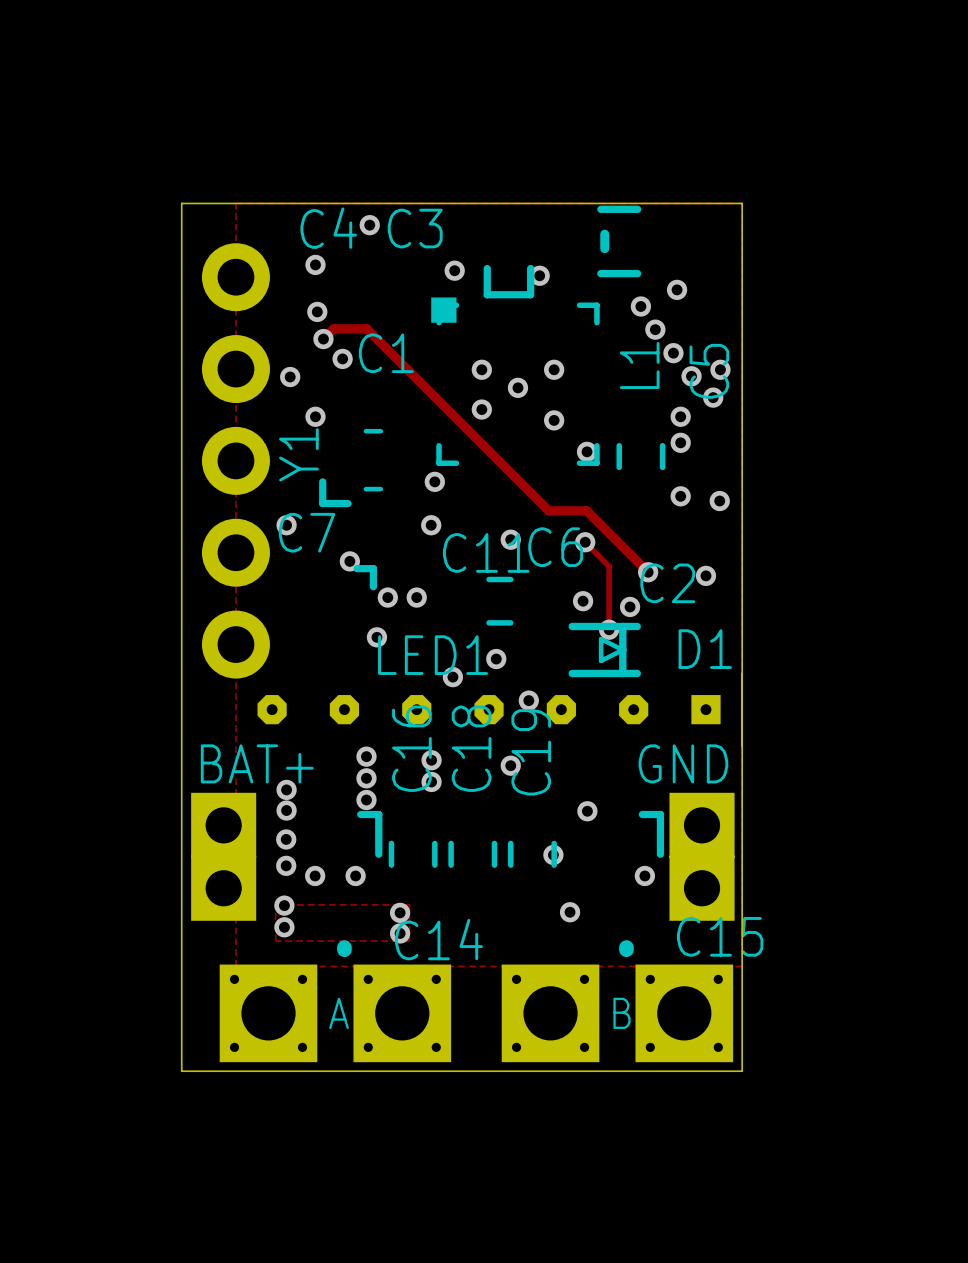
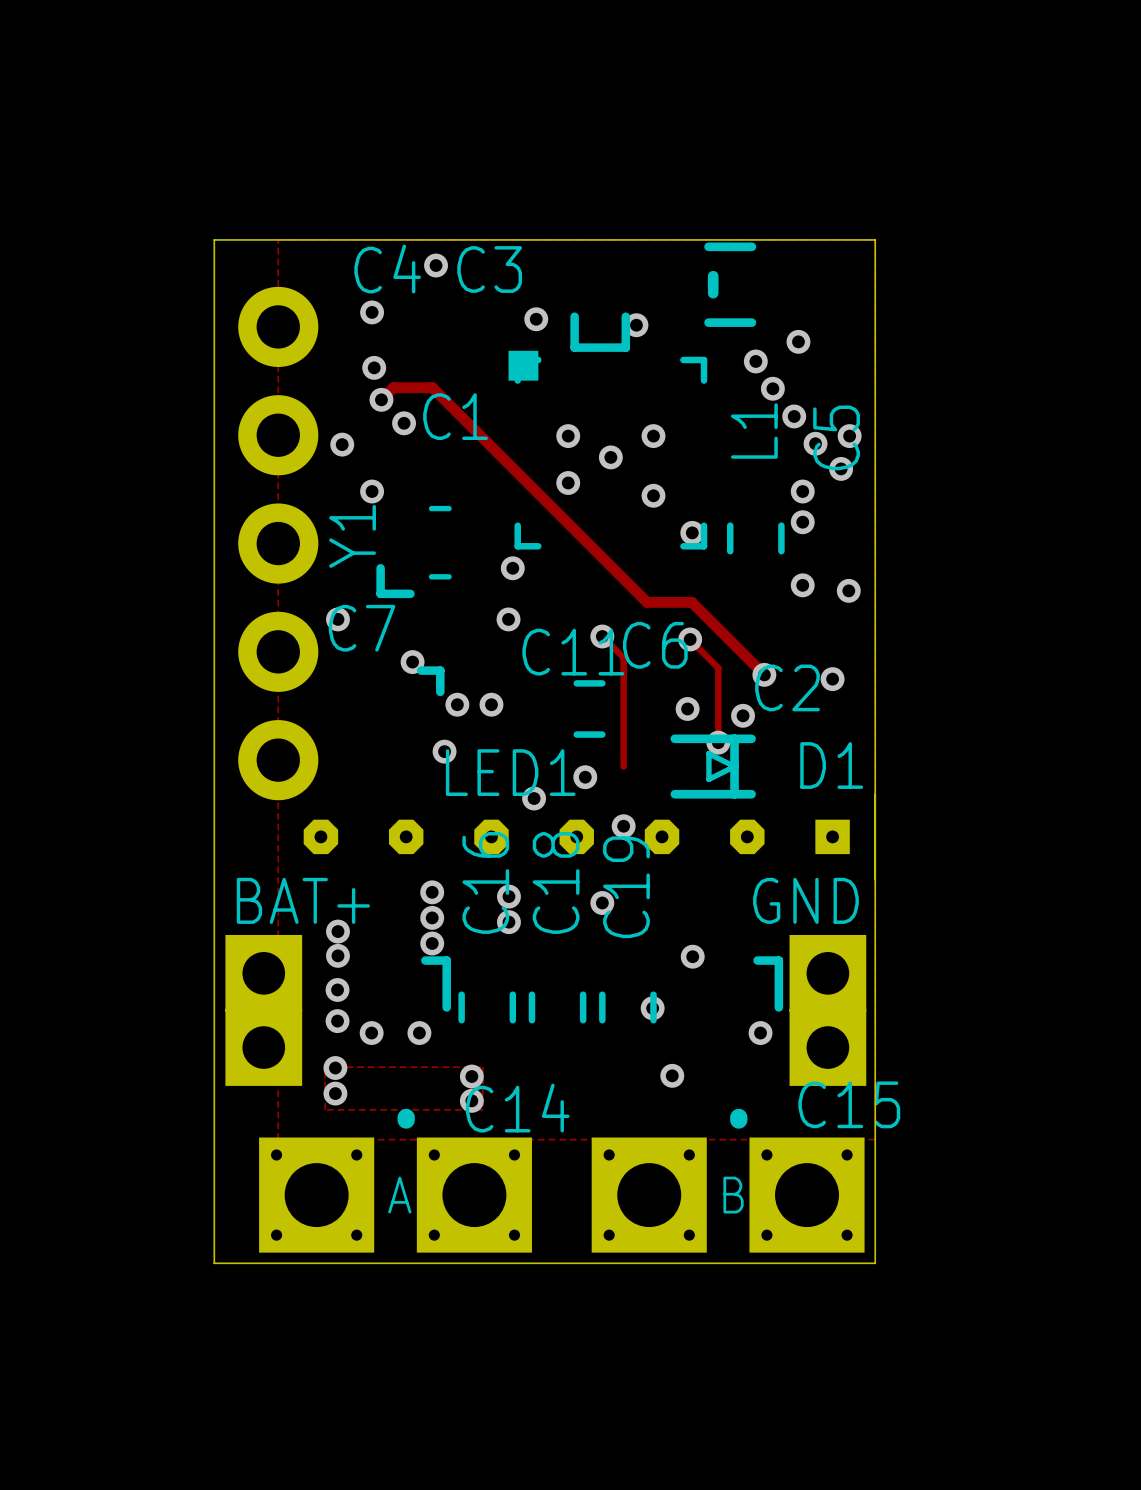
track: none -> (602, 636) (623, 657) (623, 766)

